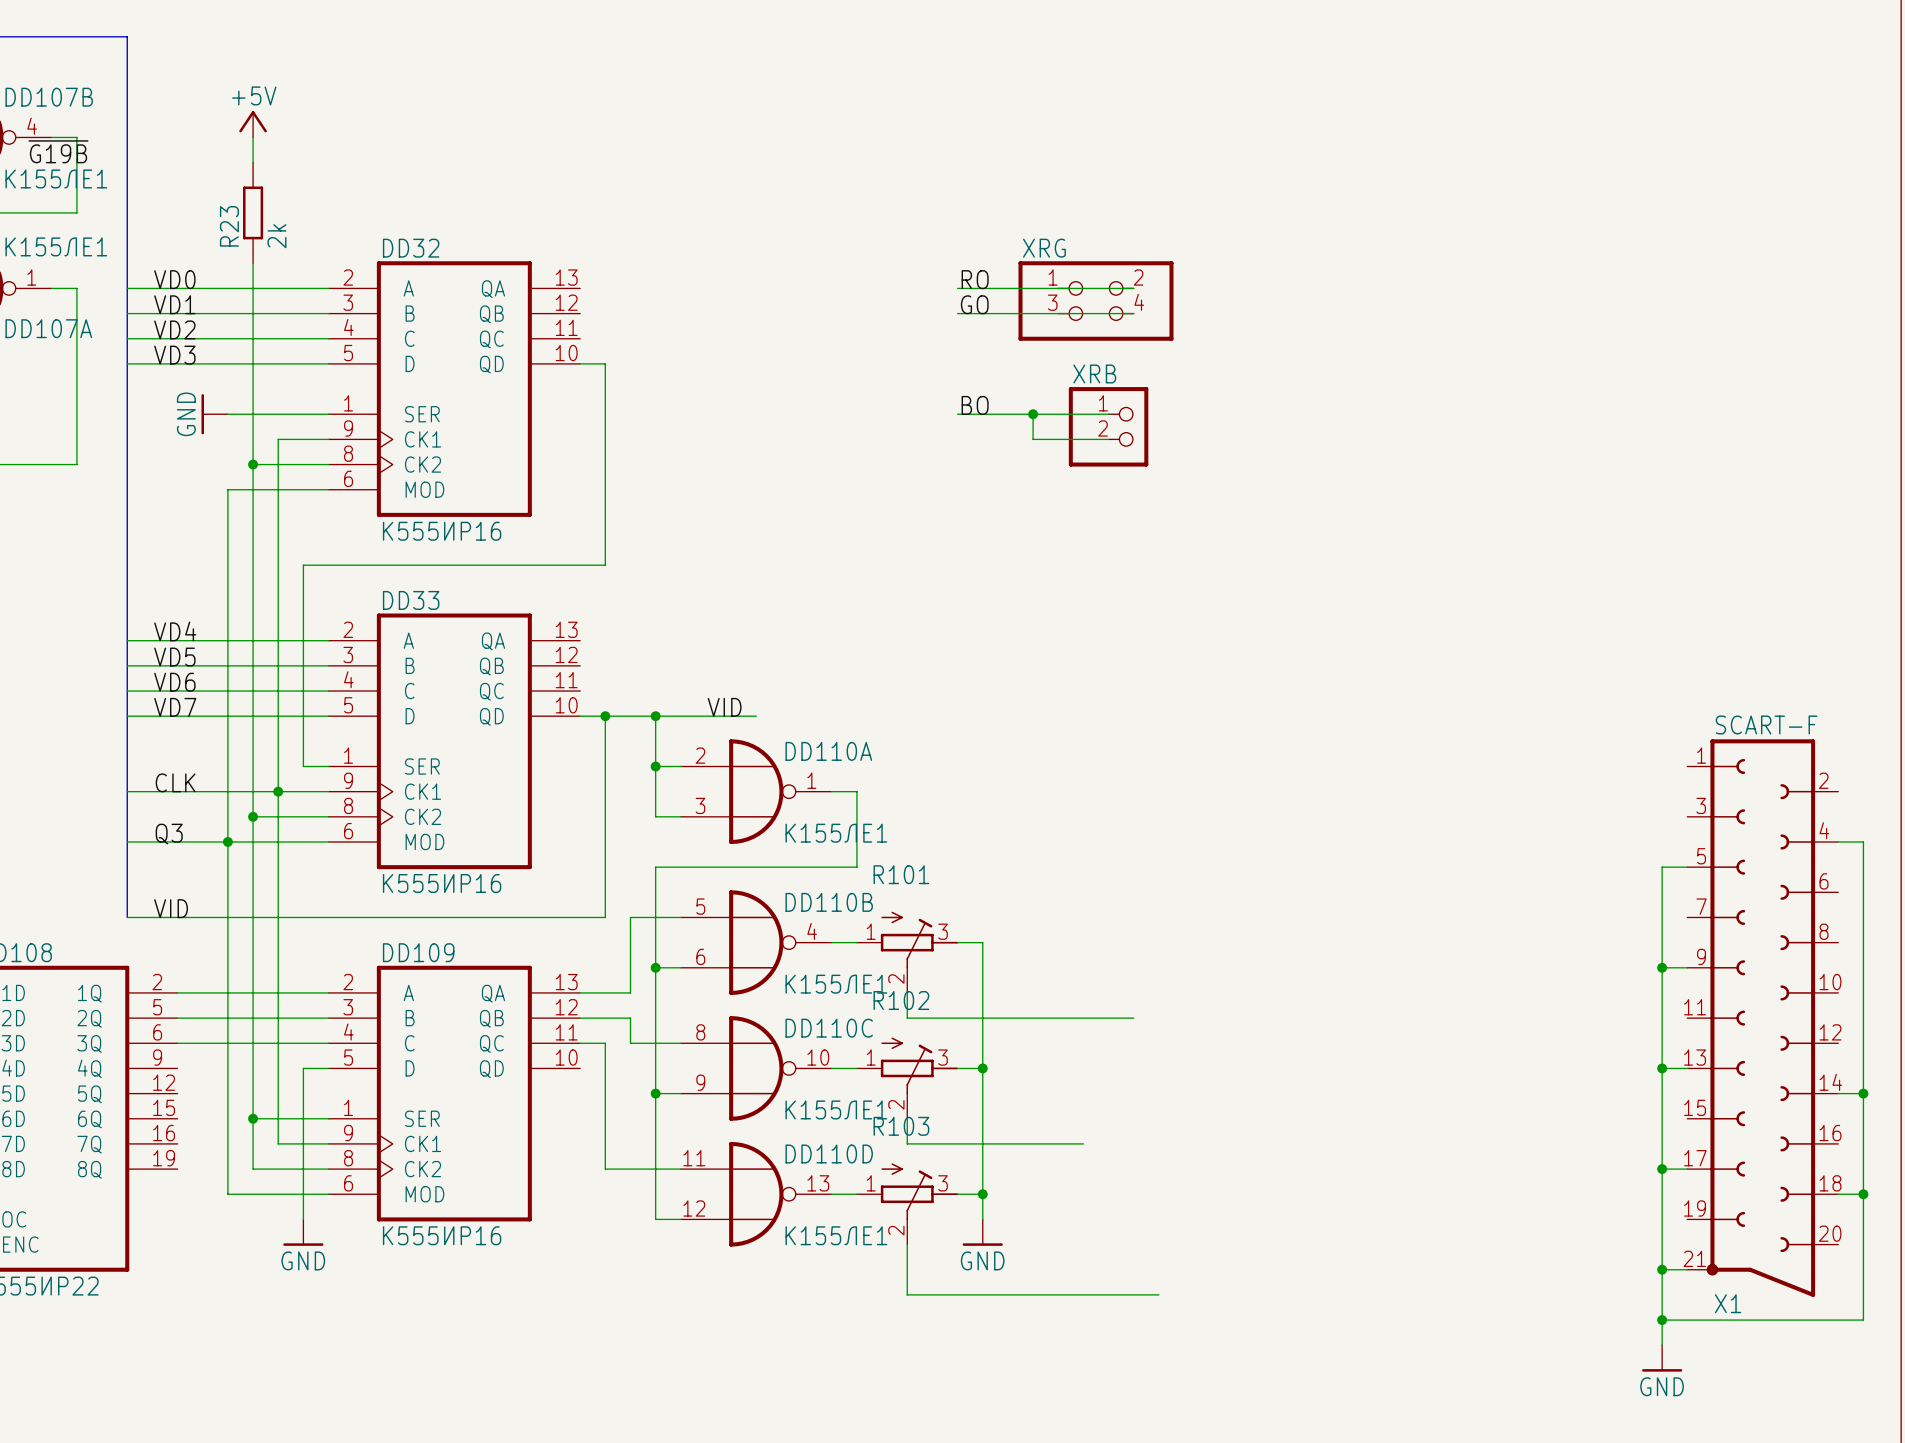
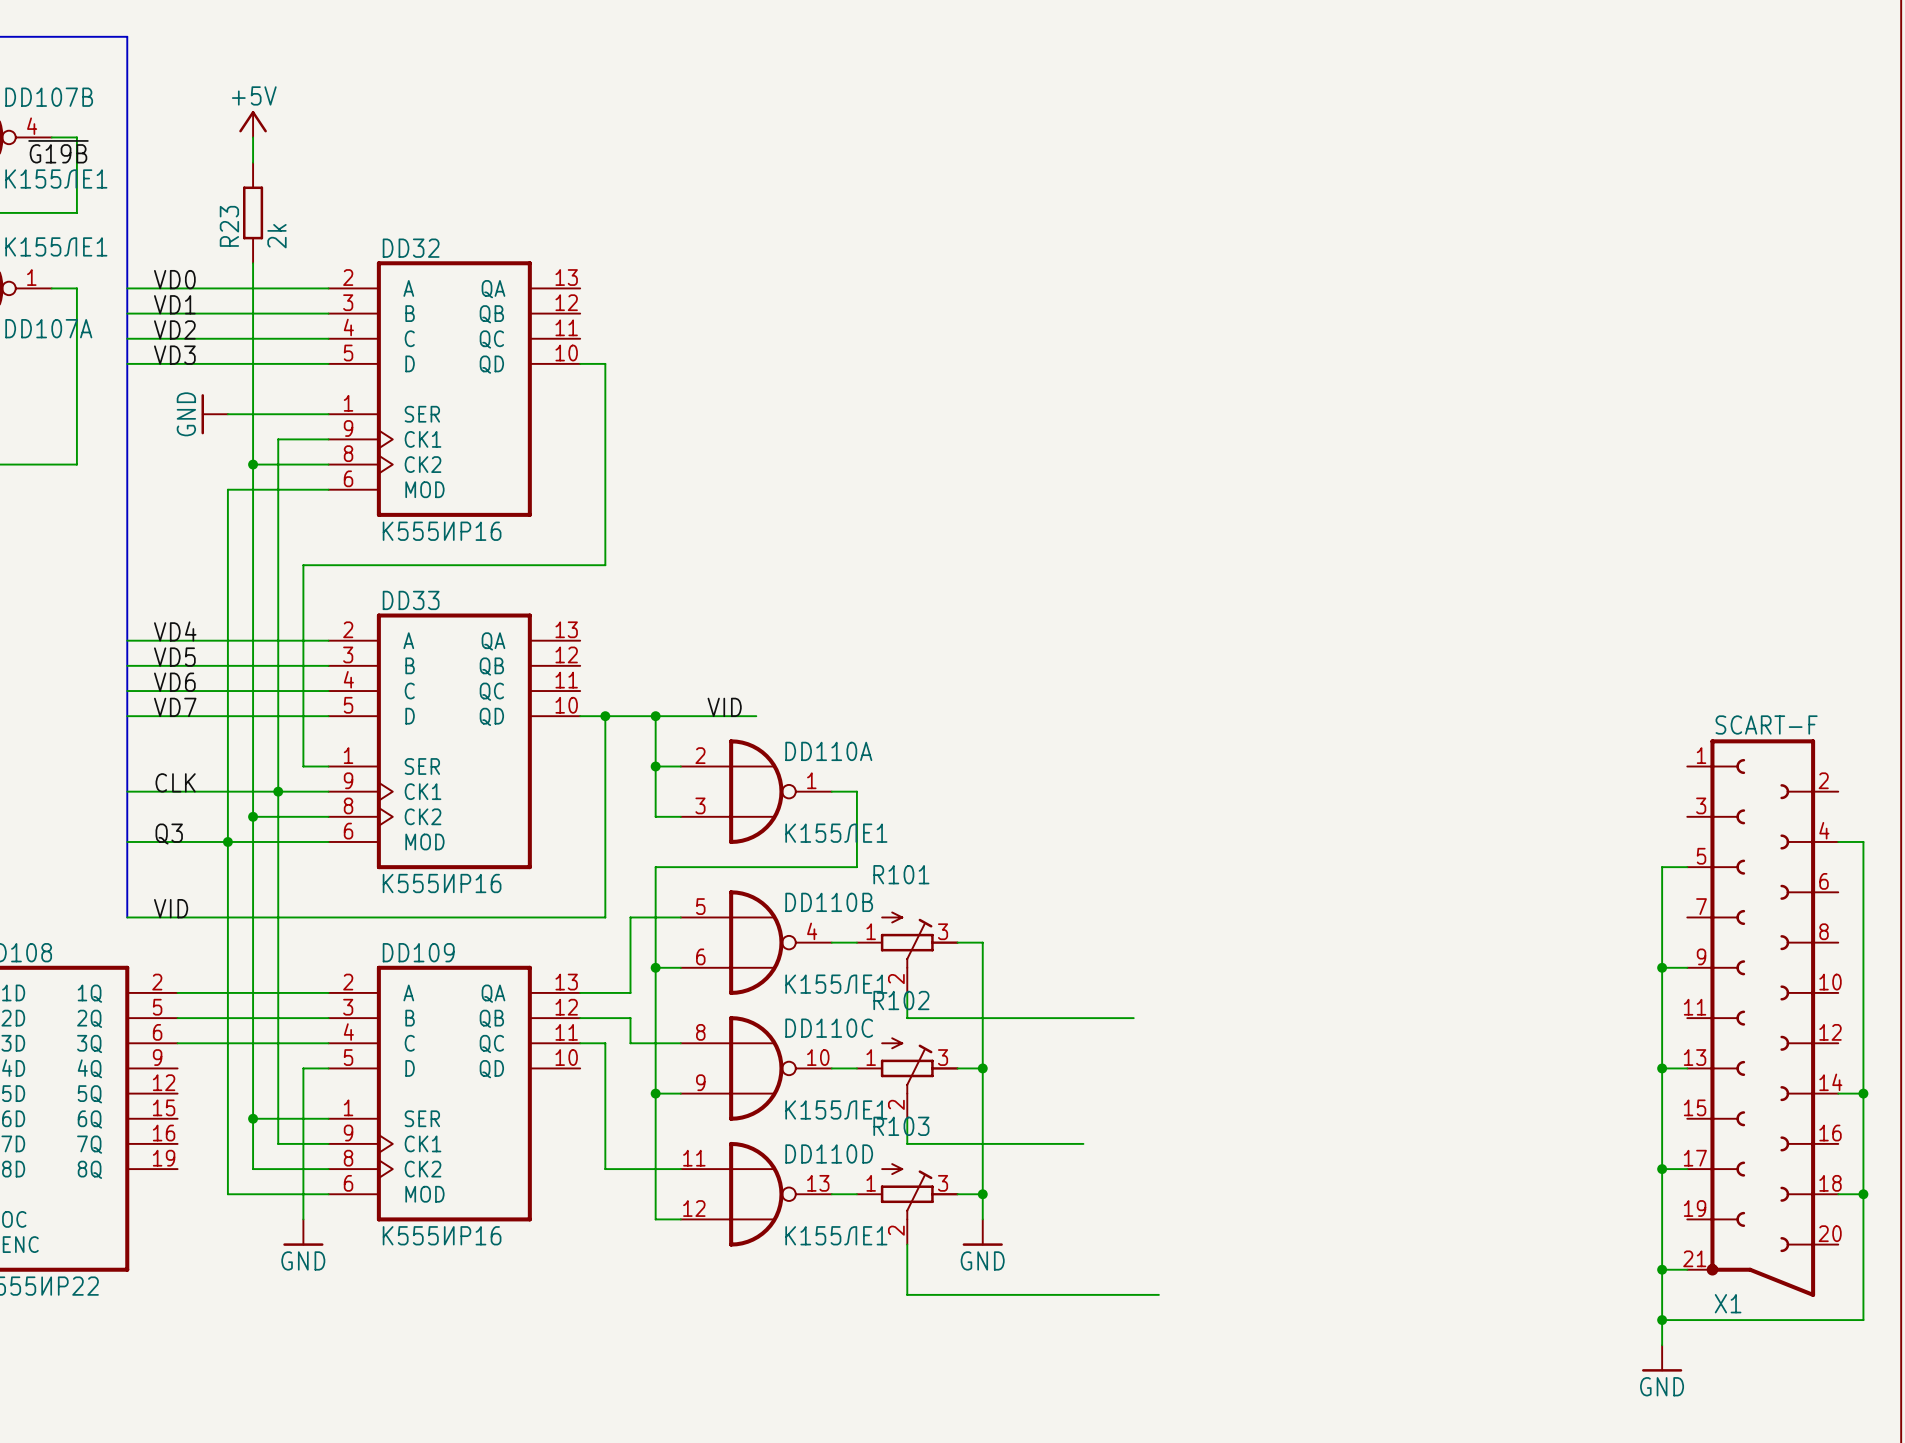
label: RO (975, 279) -> none
wire: (957, 288) (1133, 288) -> none
XRG: (1095, 301) -> none
label: GO (974, 304) -> none
wire: (957, 313) (1133, 313) -> none
label: BO (975, 405) -> none
wire: (957, 414) (1108, 414) -> none
wire: (1033, 414) (1033, 439) (1108, 439) -> none
junction: (1033, 414) -> none
XRB: (1108, 426) -> none

